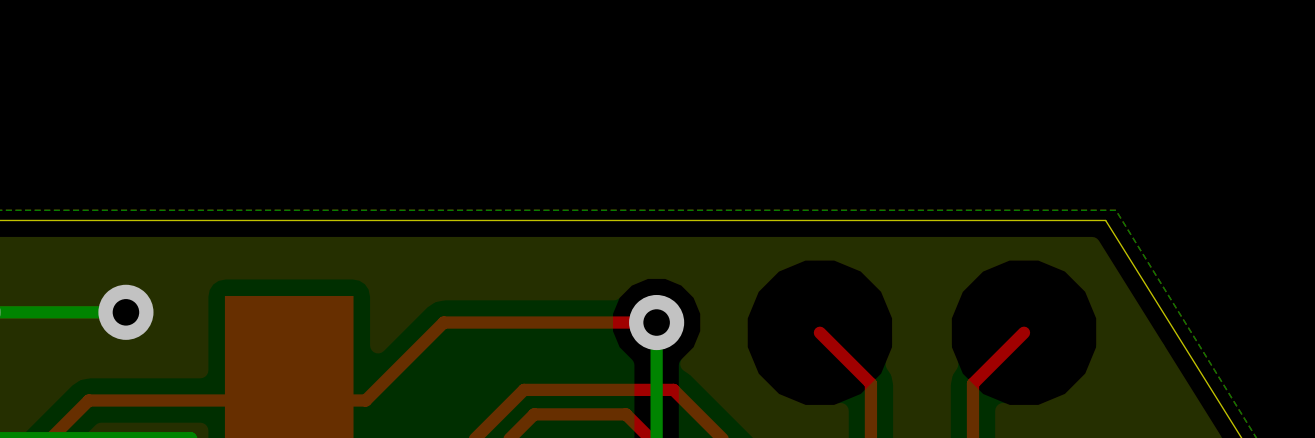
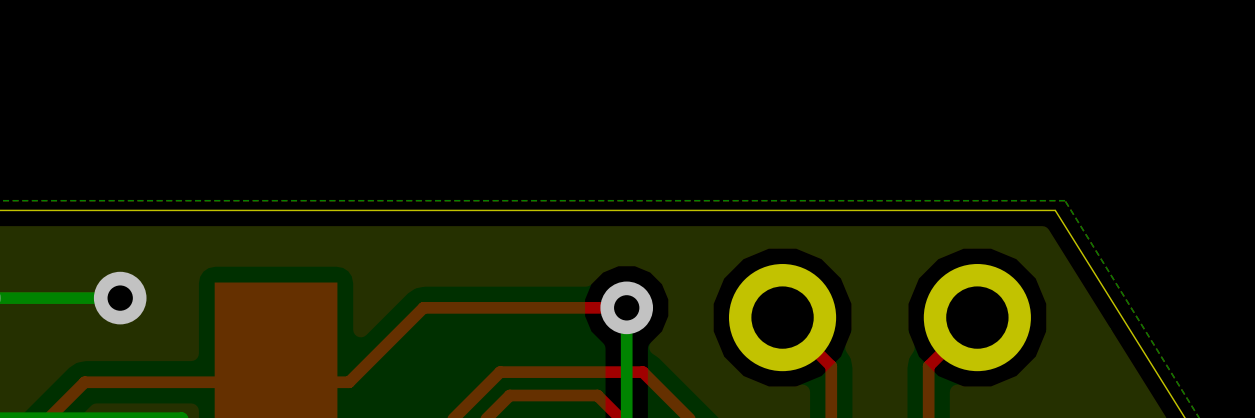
part: none -> (879, 317)

